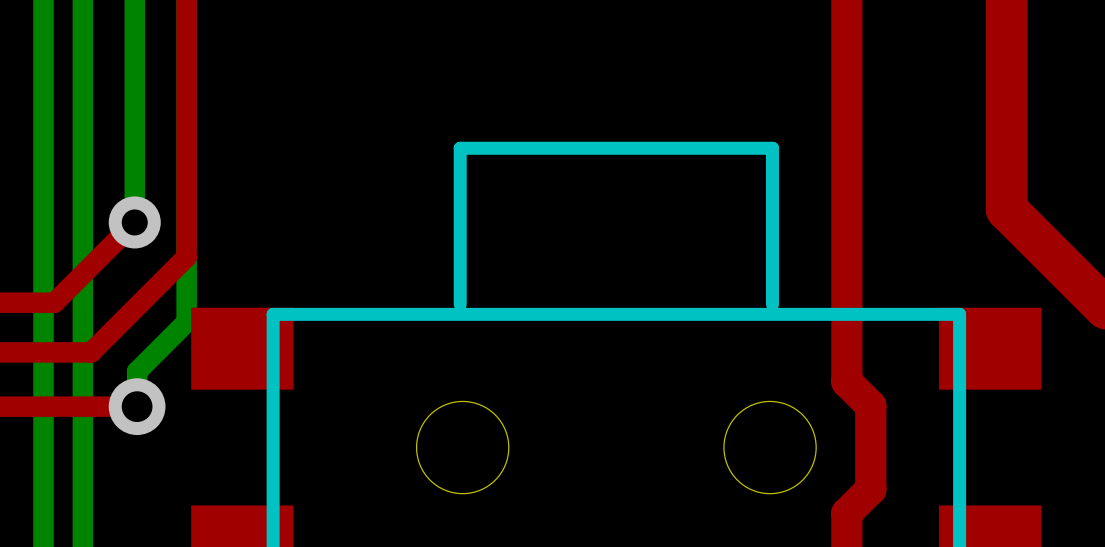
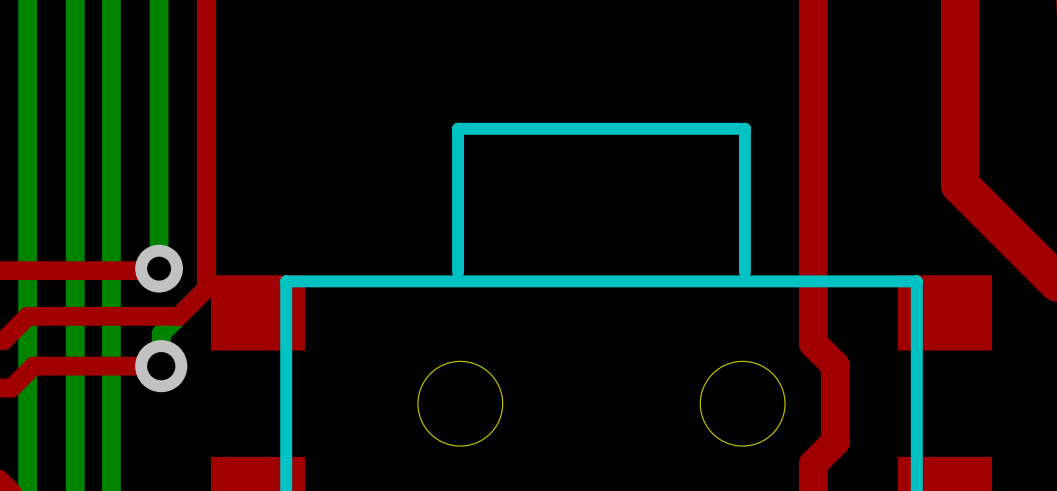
top track: (134, 222) (54, 302) -> (159, 268) (157, 270) (85, 270)
bottom track: none -> (159, 196) (159, 268)
via position: (134, 222) -> (159, 268)
top track: (186, 256) (91, 352) -> (206, 228) (206, 288) (178, 316) (119, 316)

